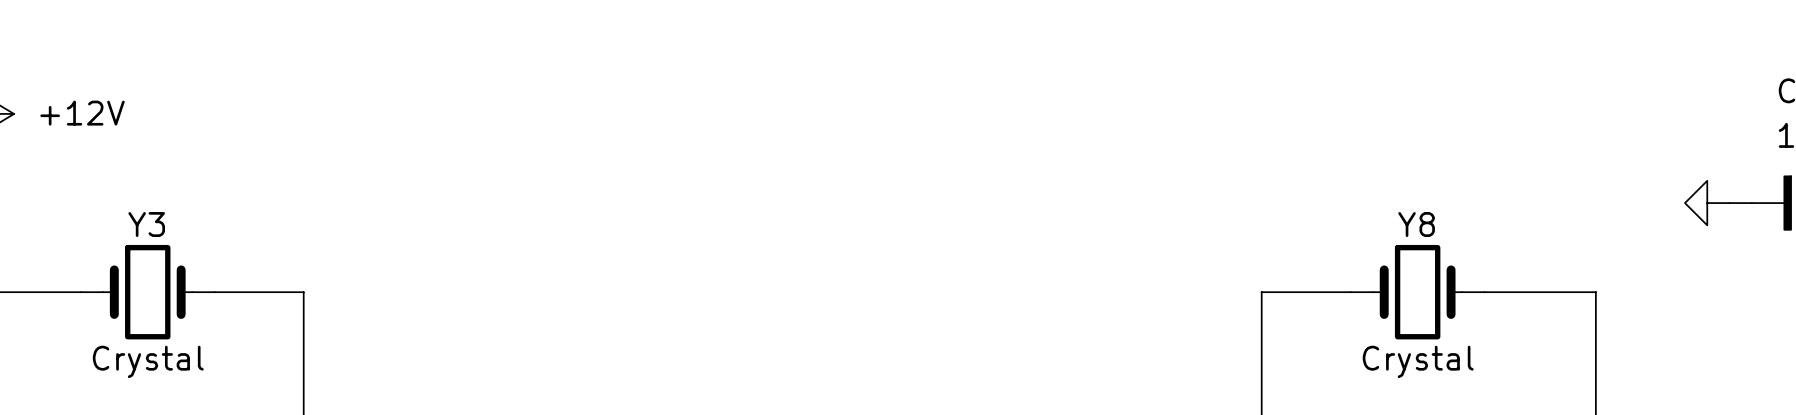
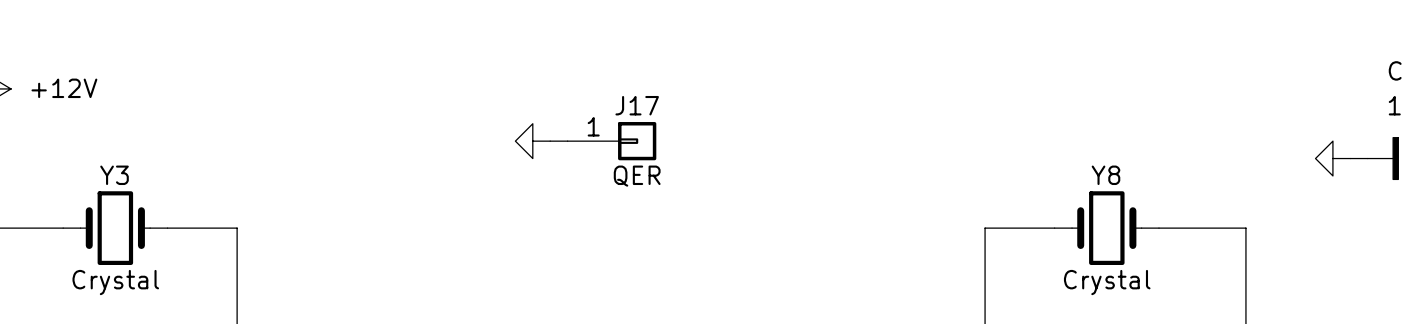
power symbol: none -> (532, 141)
wire: none -> (550, 141) (567, 141)
J17: none -> QER (611, 141)

